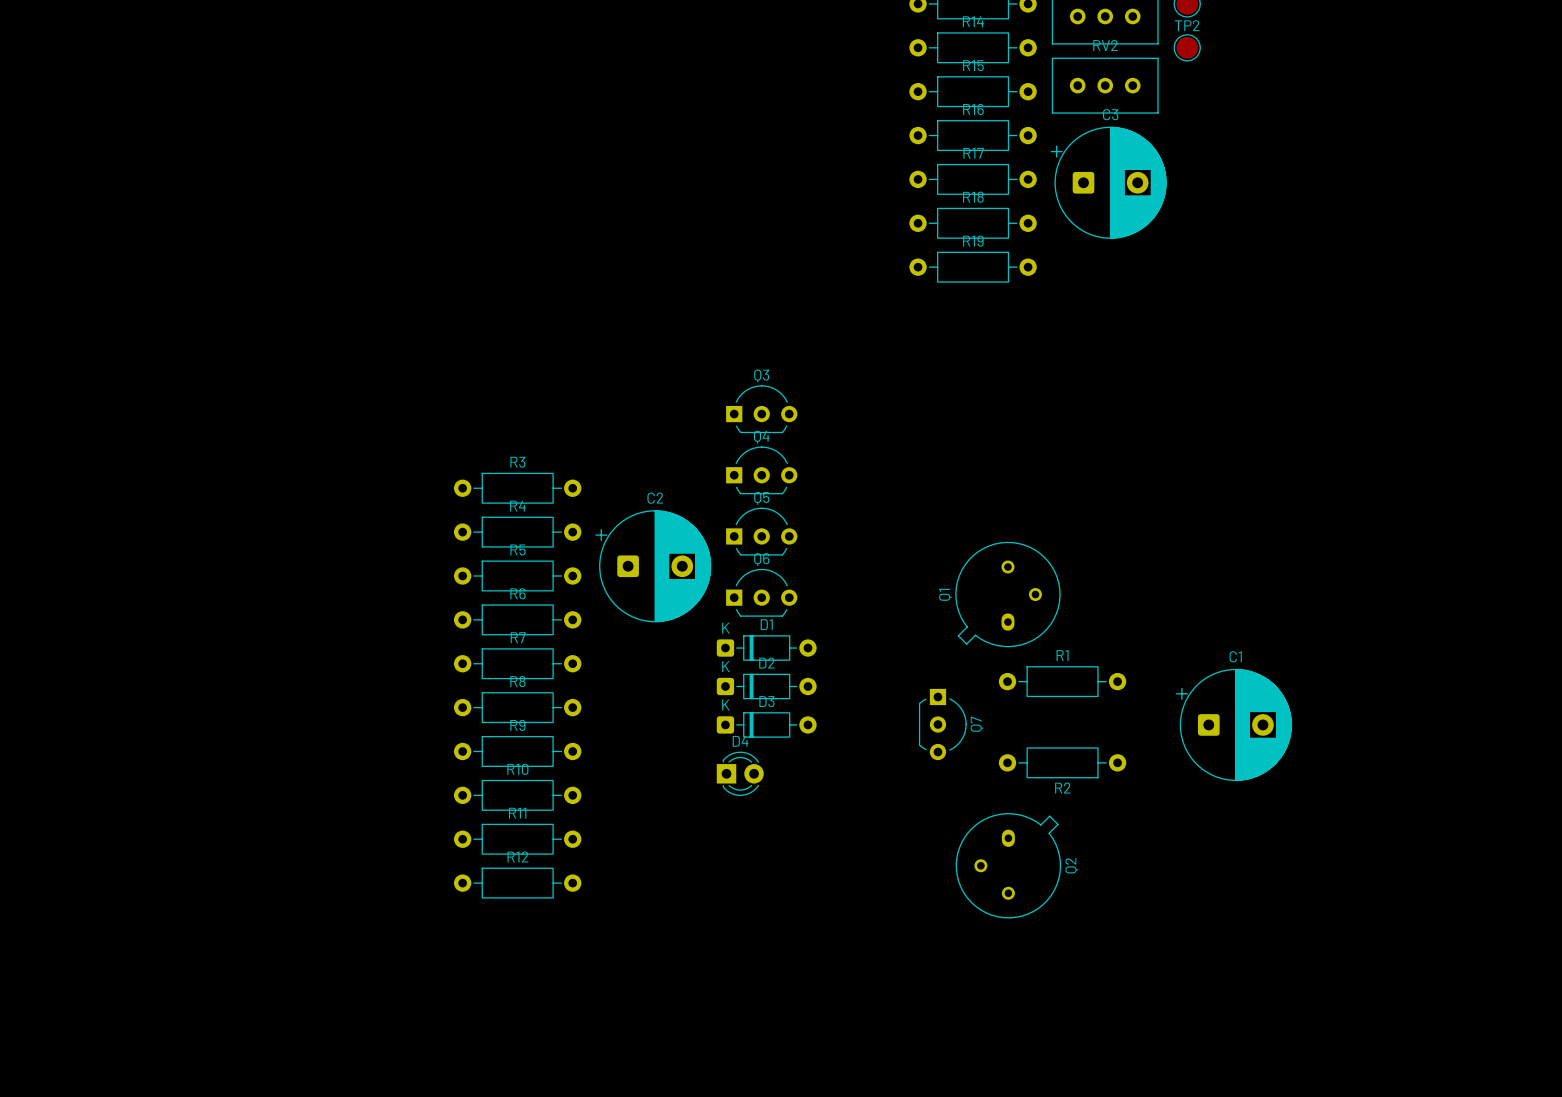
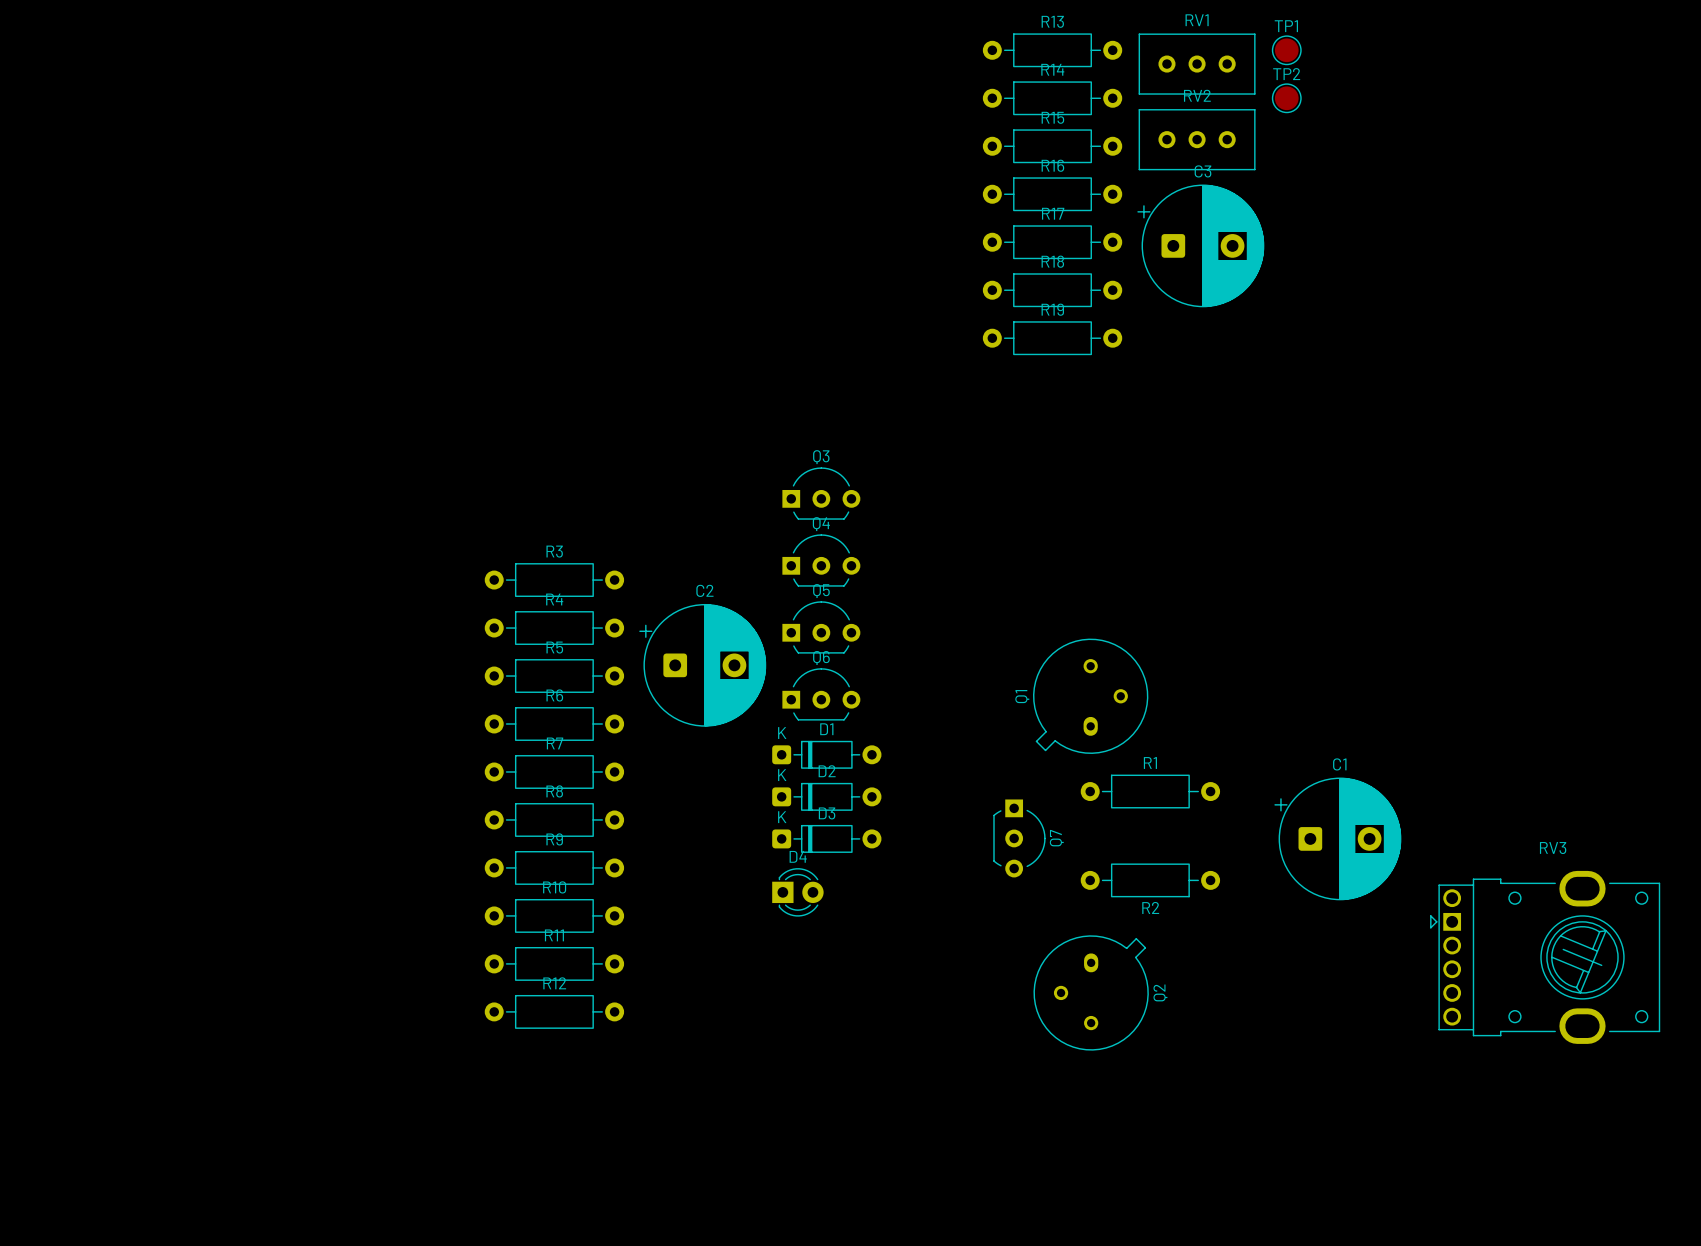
RV3: none -> (1545, 957)

